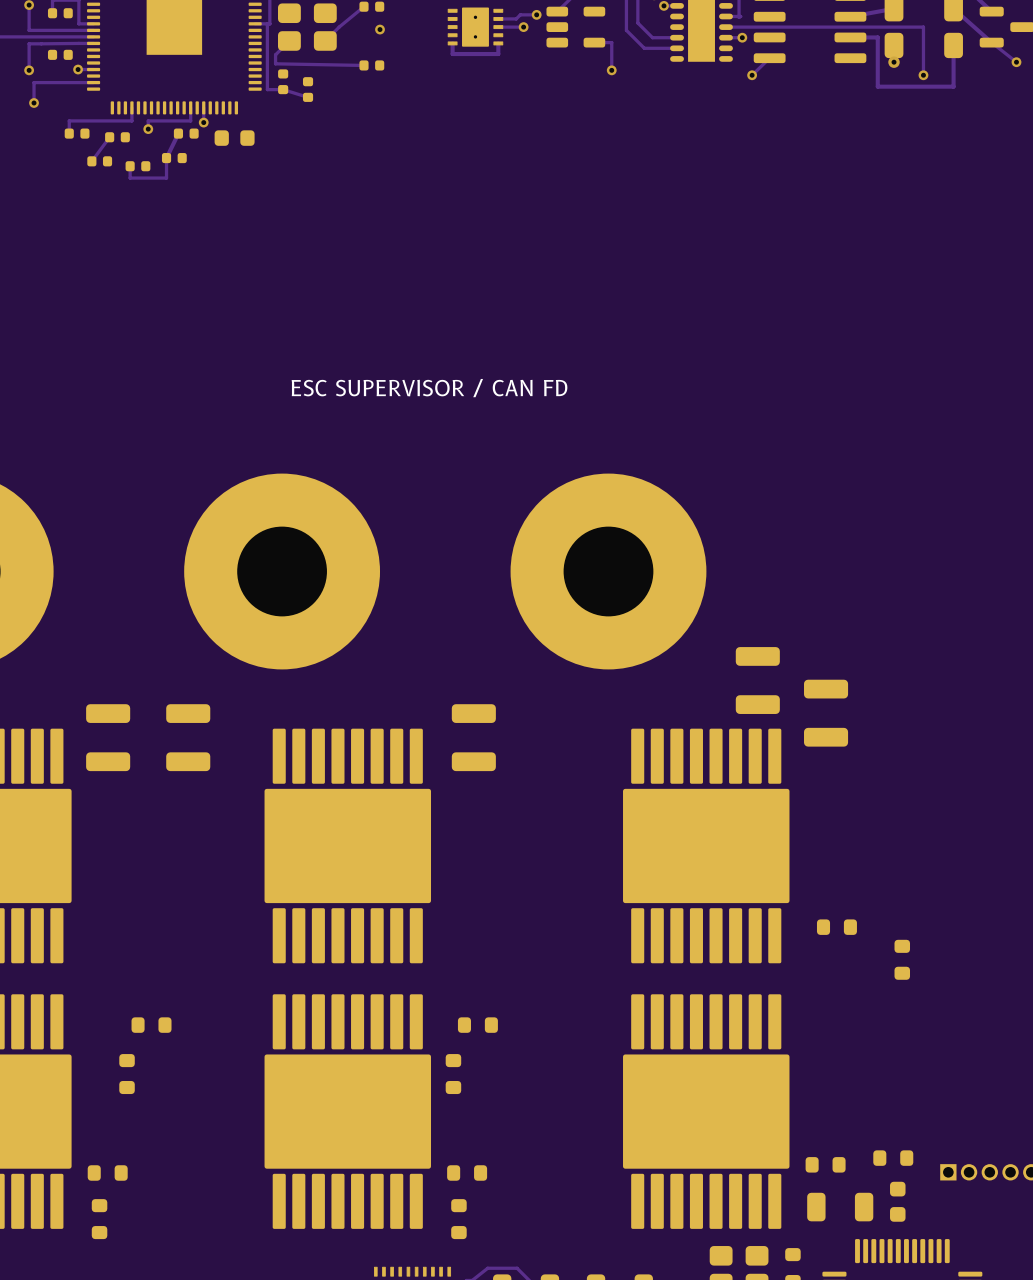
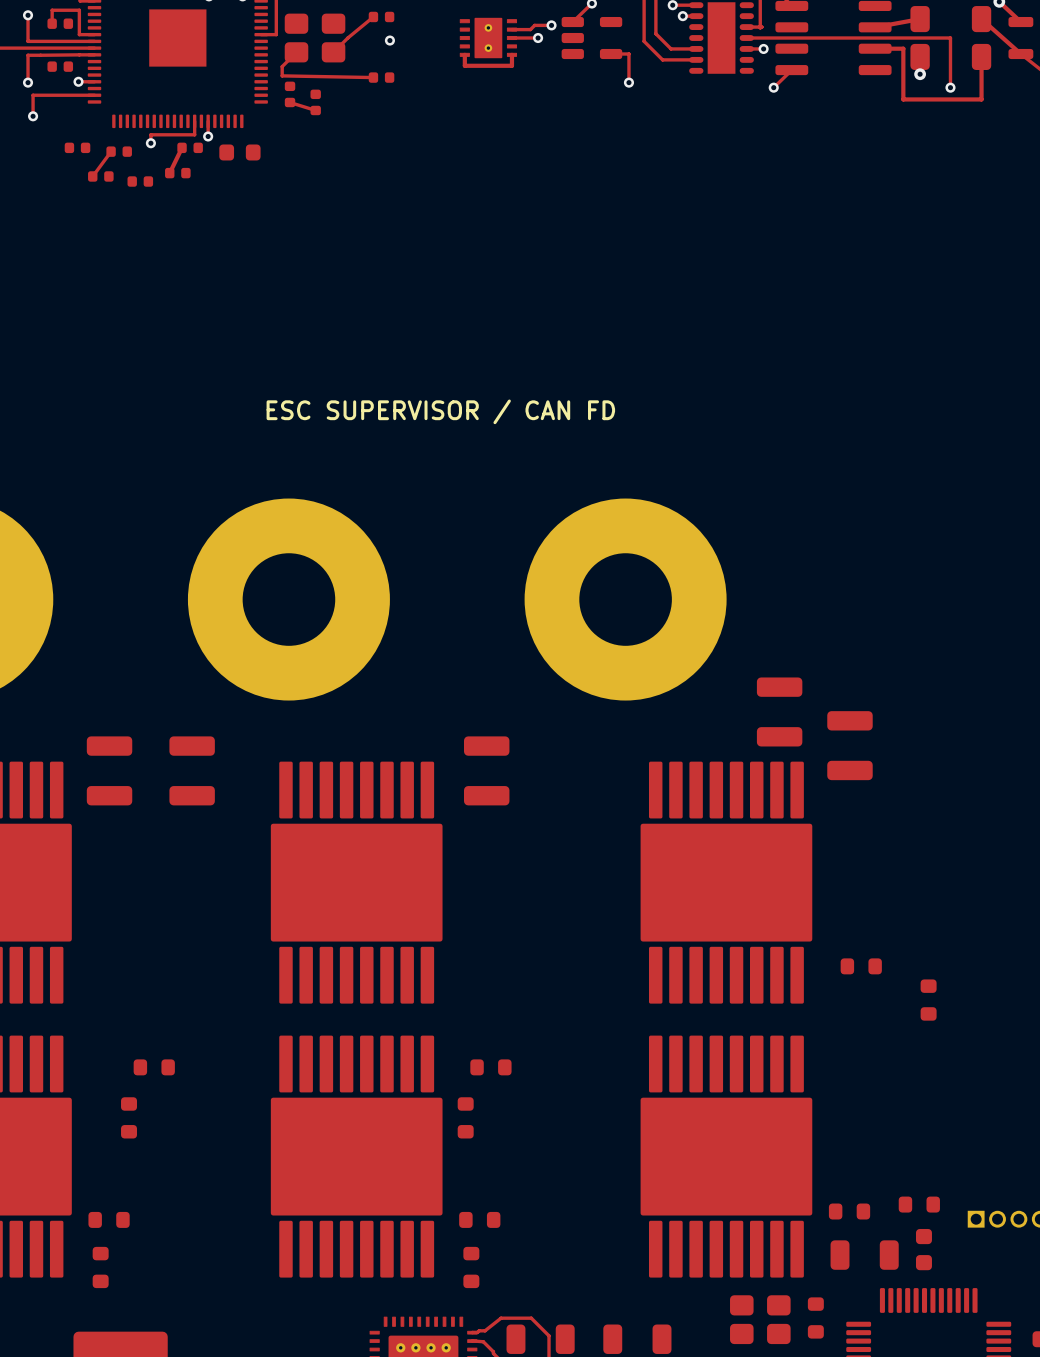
track: (267, 23) (267, 89) (283, 89) -> none
track: (131, 107) (131, 120) (69, 120) (69, 133) -> none
track: (166, 158) (166, 178) (130, 178) (130, 166) -> none

